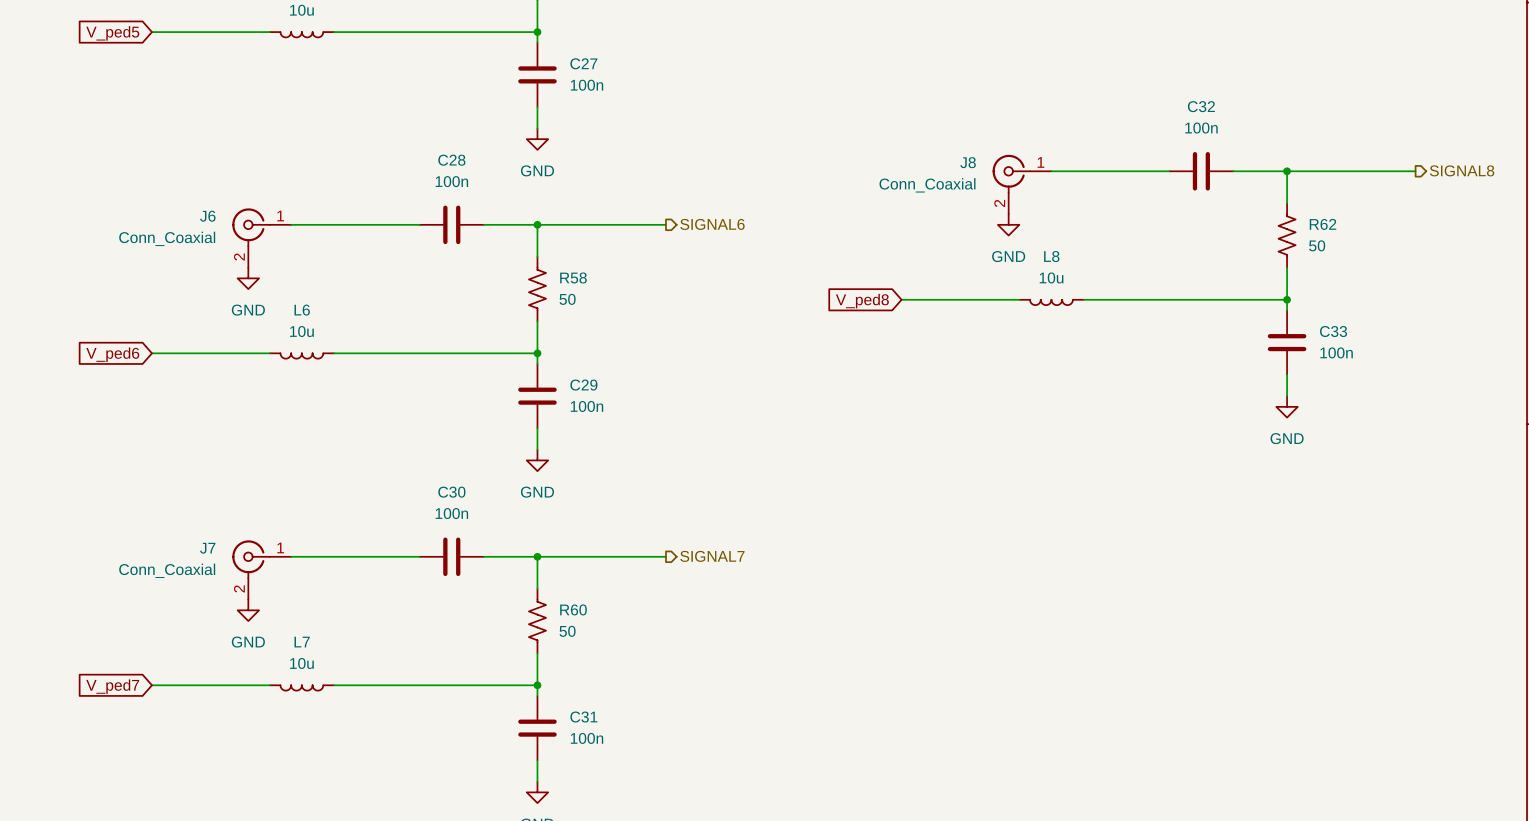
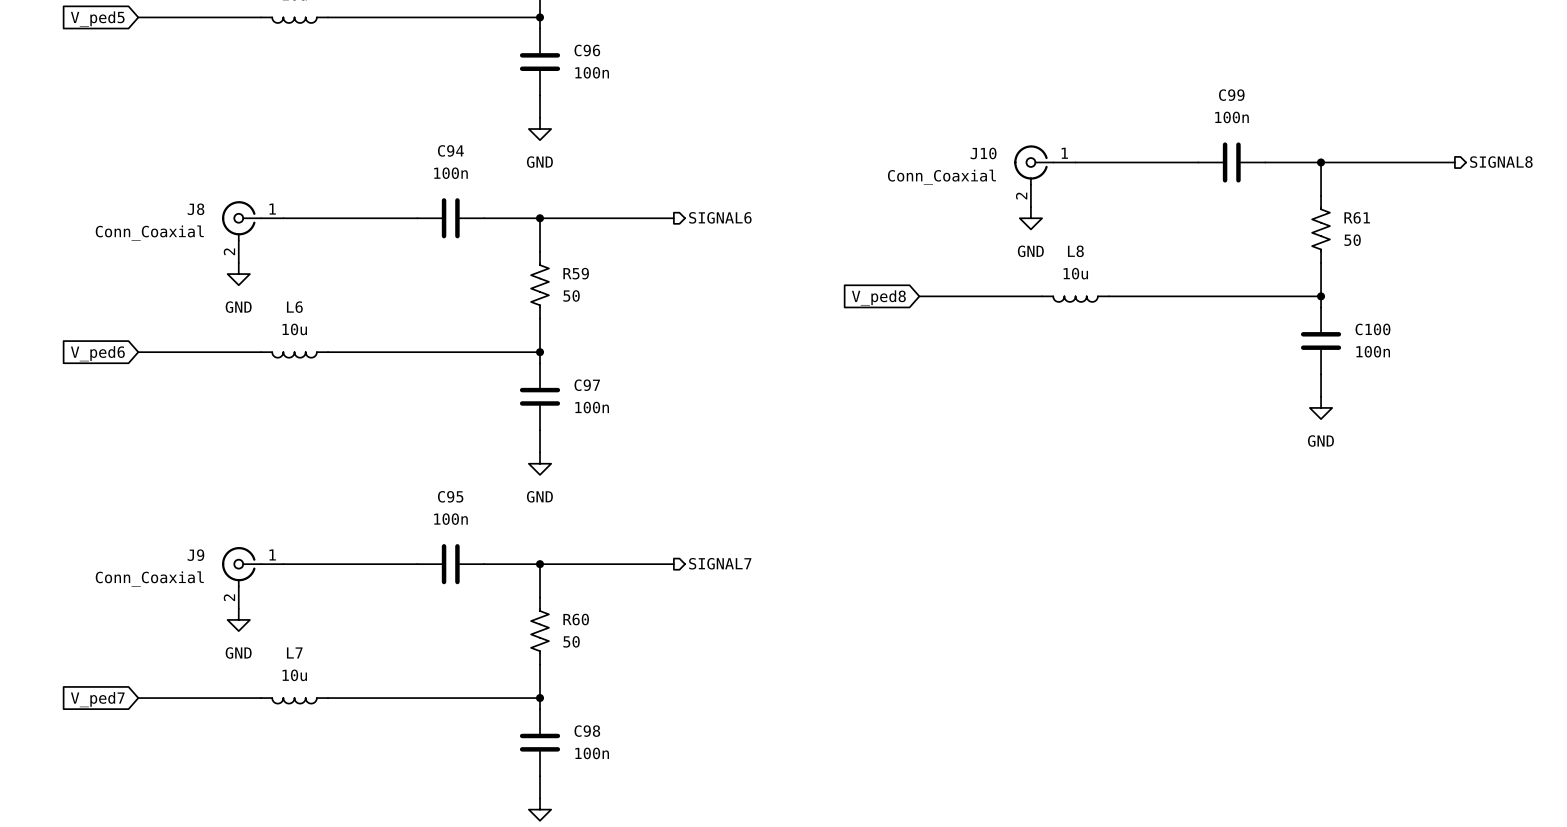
C27 name: C27 (583, 63) -> C96 (587, 50)
C32 name: C32 (1201, 106) -> C99 (1231, 95)
C28 name: C28 (451, 160) -> C94 (450, 150)
J8 name: J8 (968, 162) -> J10 (983, 153)
J6 name: J6 (207, 216) -> J8 (195, 209)
R62 name: R62 (1323, 224) -> R61 (1357, 217)
R58 name: R58 (573, 277) -> R59 (576, 273)
C33 name: C33 (1333, 331) -> C100 (1372, 329)
C29 name: C29 (583, 385) -> C97 (587, 385)
C30 name: C30 (451, 492) -> C95 (450, 496)
J7 name: J7 (207, 548) -> J9 (195, 555)
C31 name: C31 (583, 717) -> C98 (587, 731)

